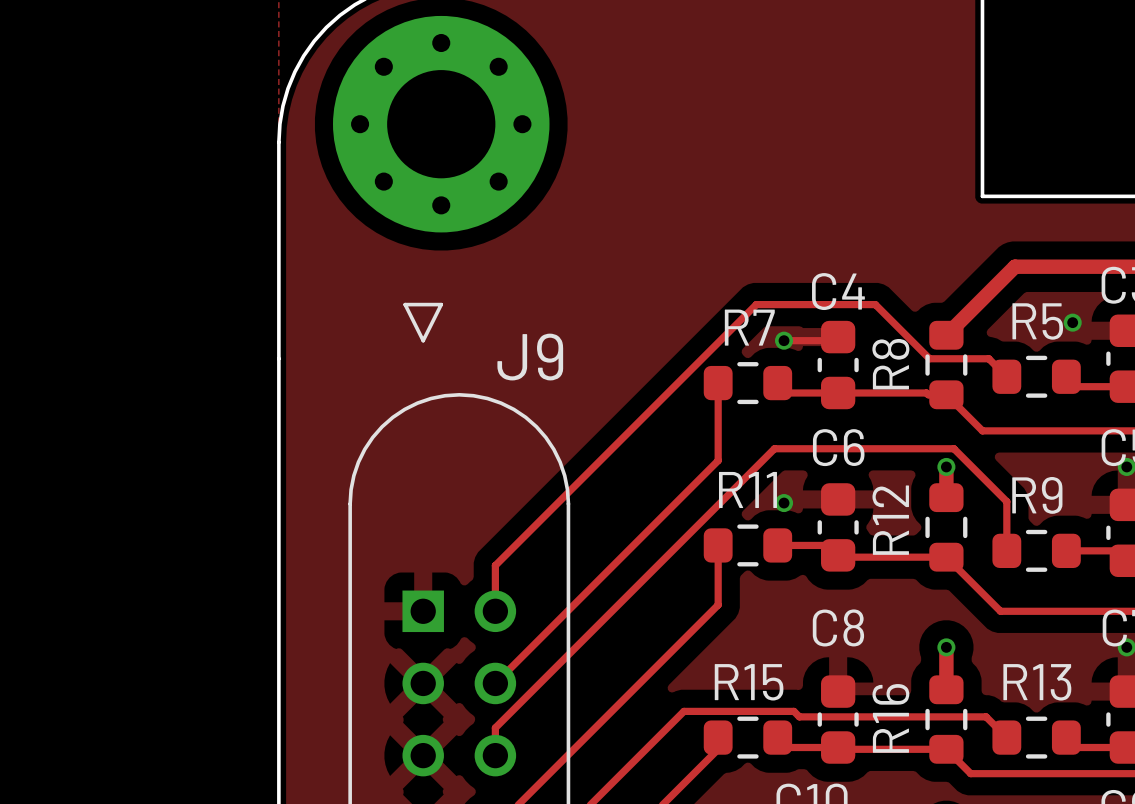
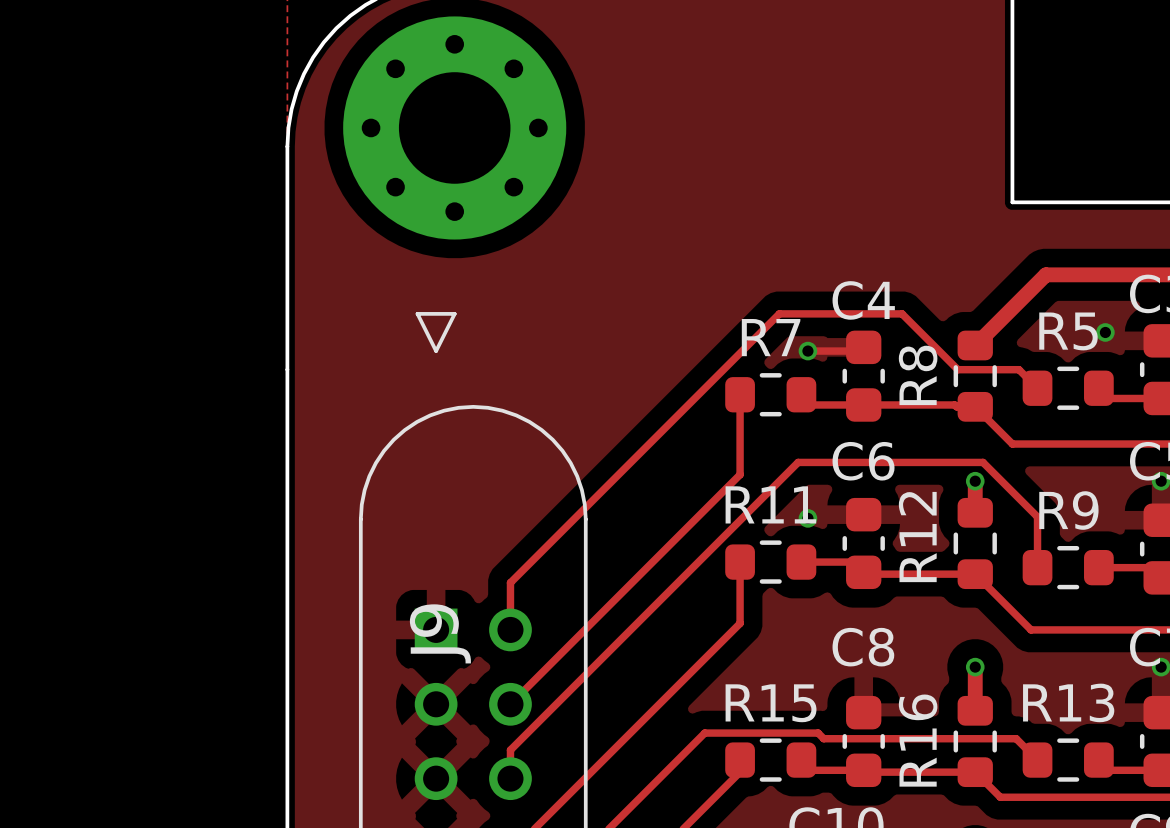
J9 name rotation: 0° (530, 357) -> 90° counterclockwise (440, 633)
J9 name position: J9 (530, 357) -> J9 (440, 633)

